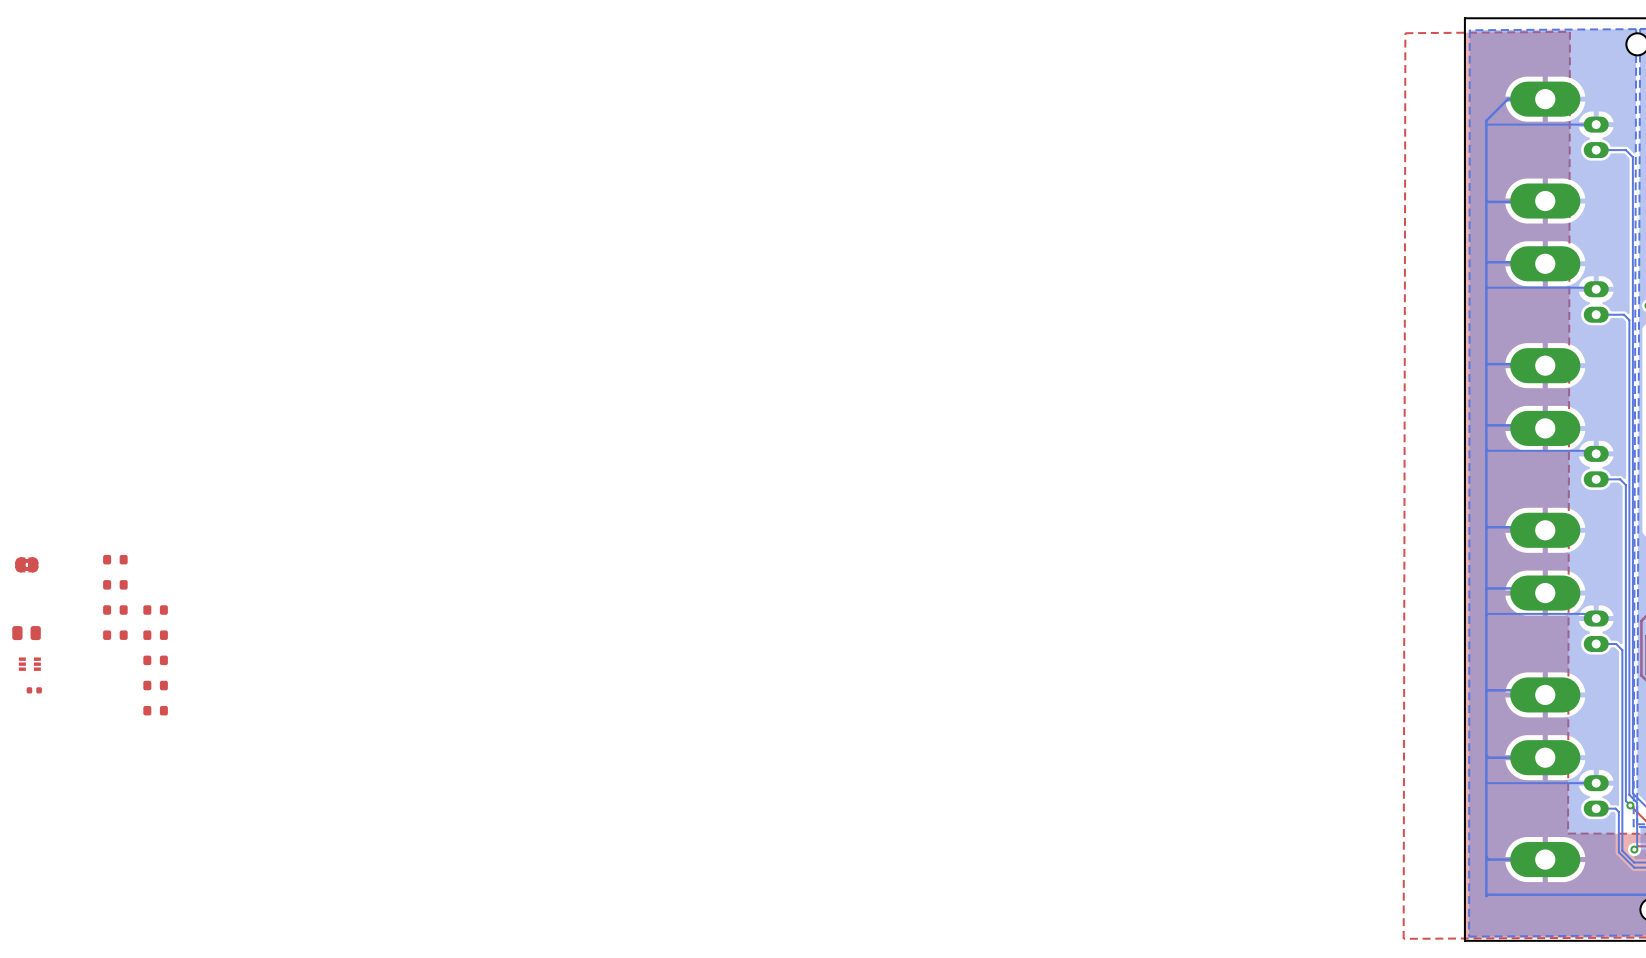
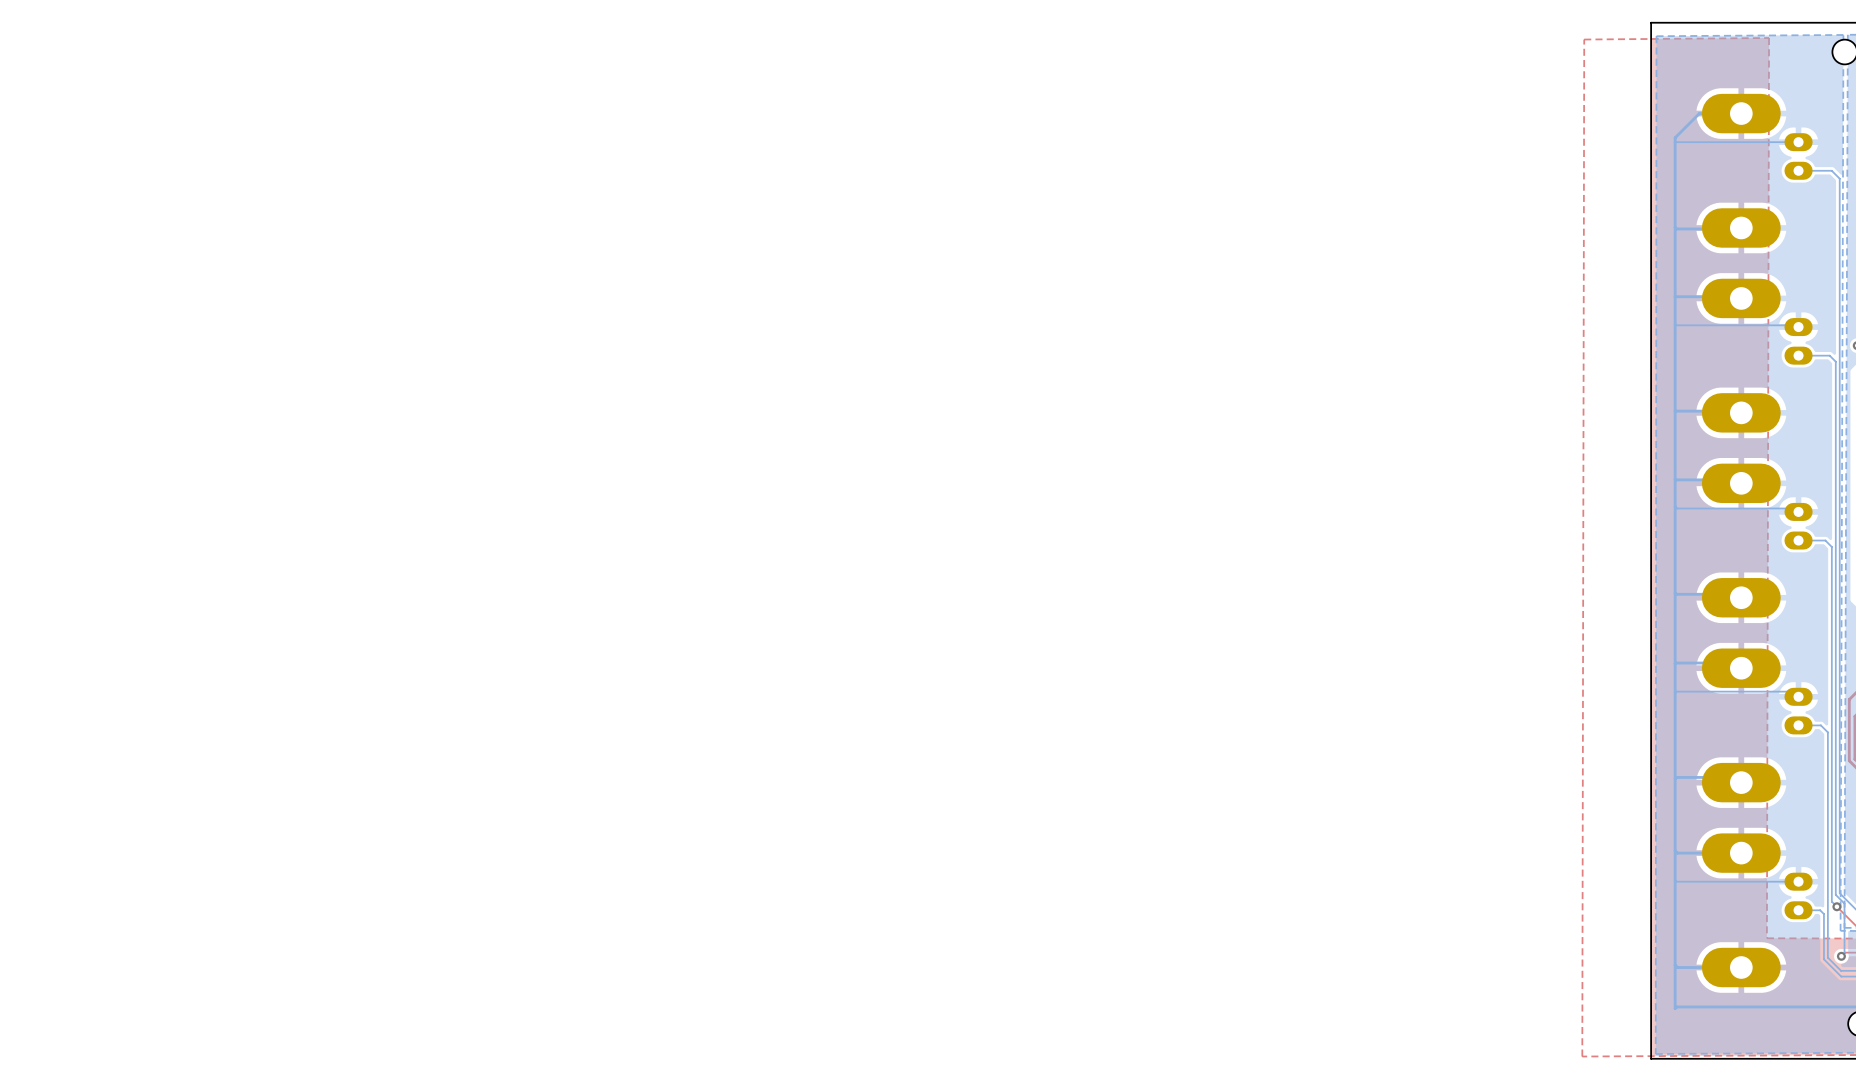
part: (115, 559) -> none
part: (26, 564) -> none
part: (115, 584) -> none
part: (115, 610) -> none
part: (155, 610) -> none
part: (26, 633) -> none
part: (115, 635) -> none
part: (155, 635) -> none
part: (155, 660) -> none
part: (29, 664) -> none
part: (155, 685) -> none
part: (34, 690) -> none
part: (155, 710) -> none

